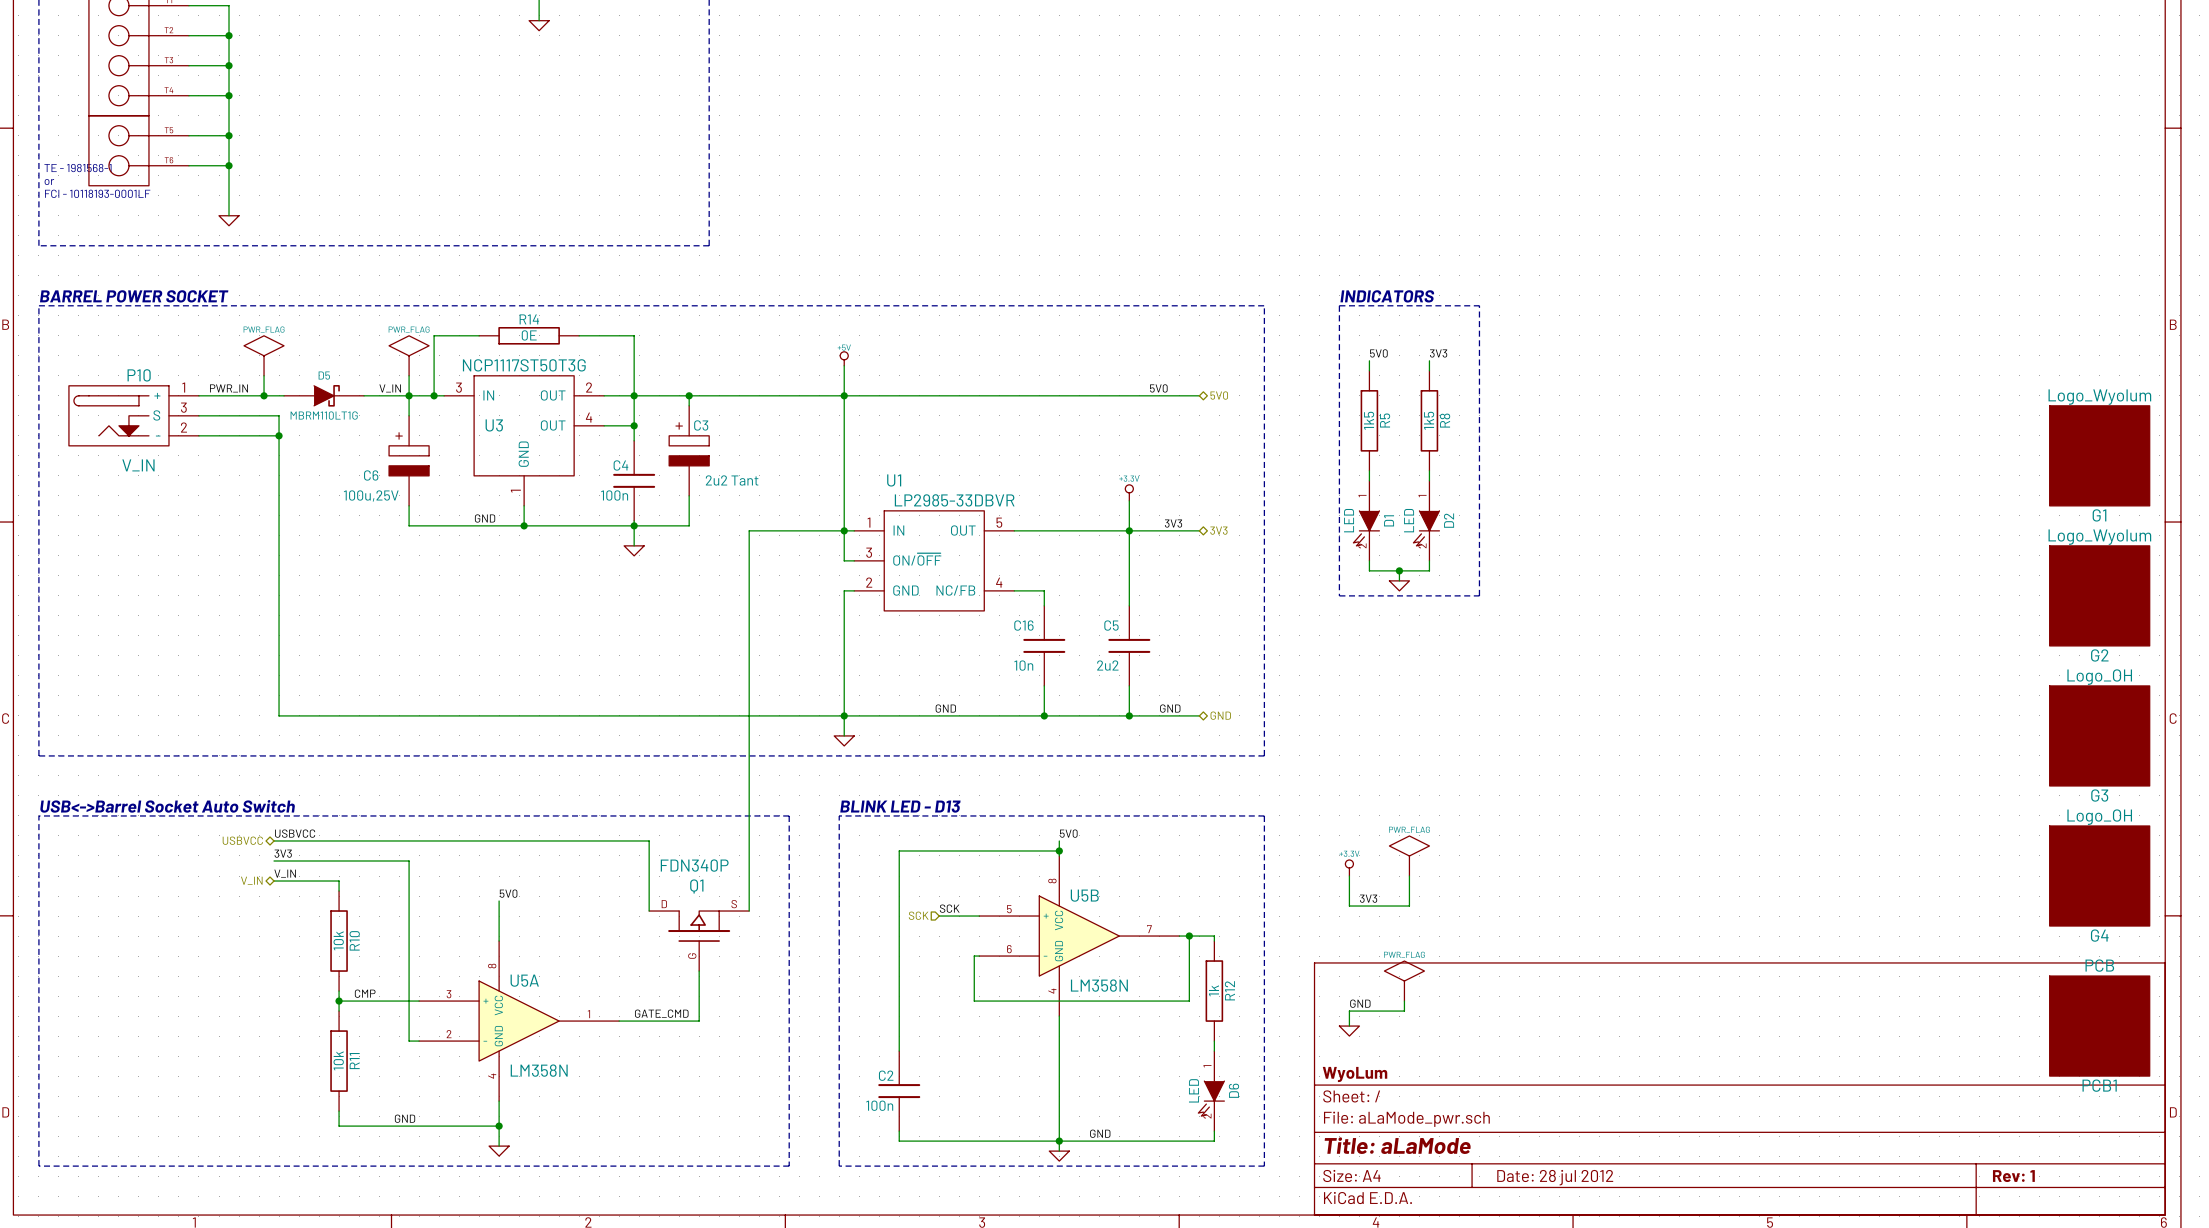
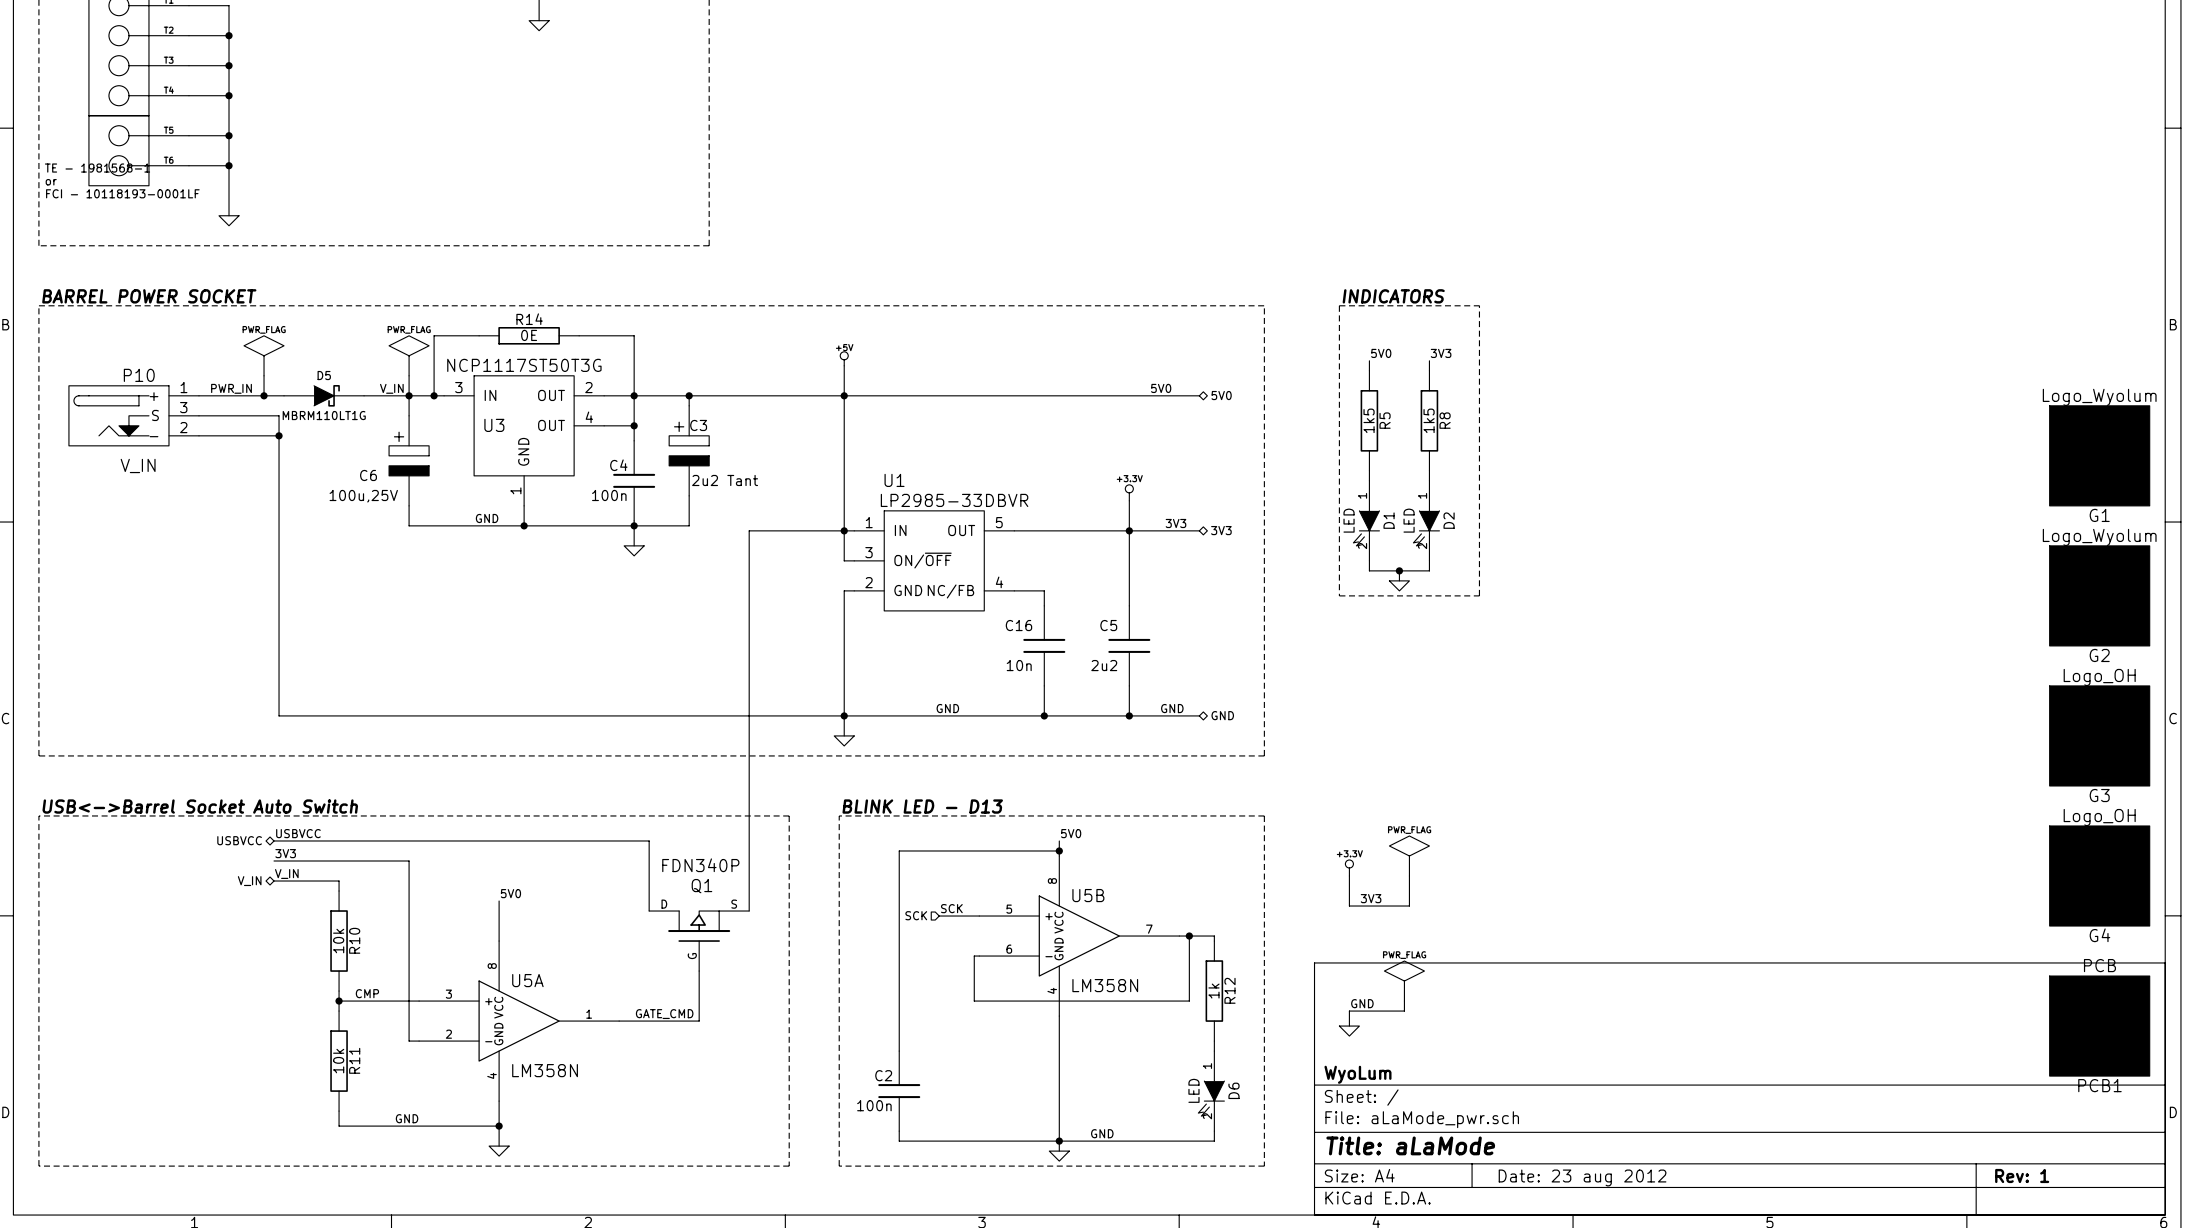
title block: Date: 28 jul 2012 (1555, 1177) -> Date: 23 aug 2012 (1582, 1177)

